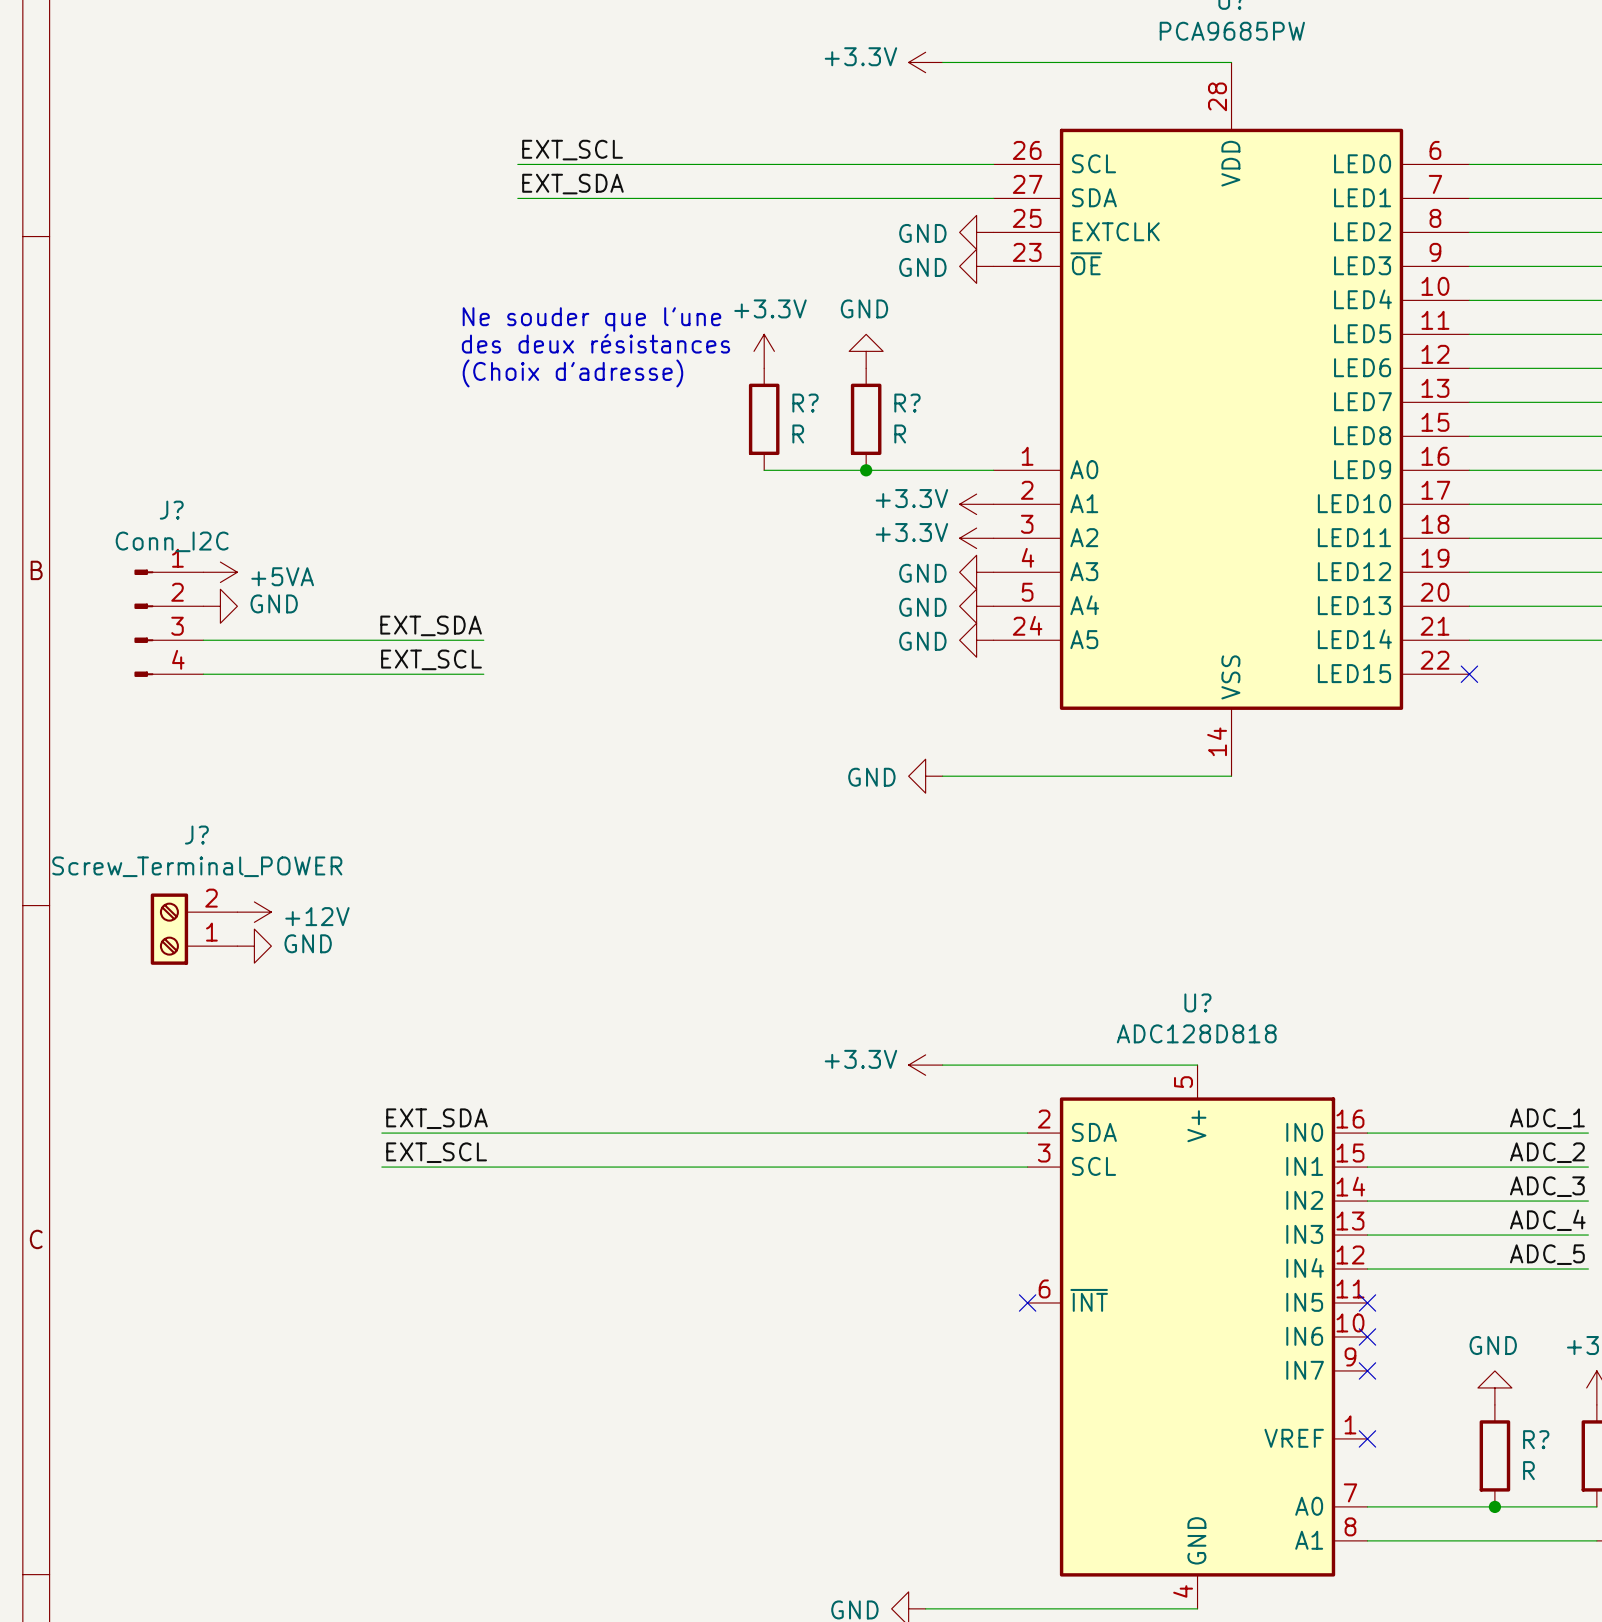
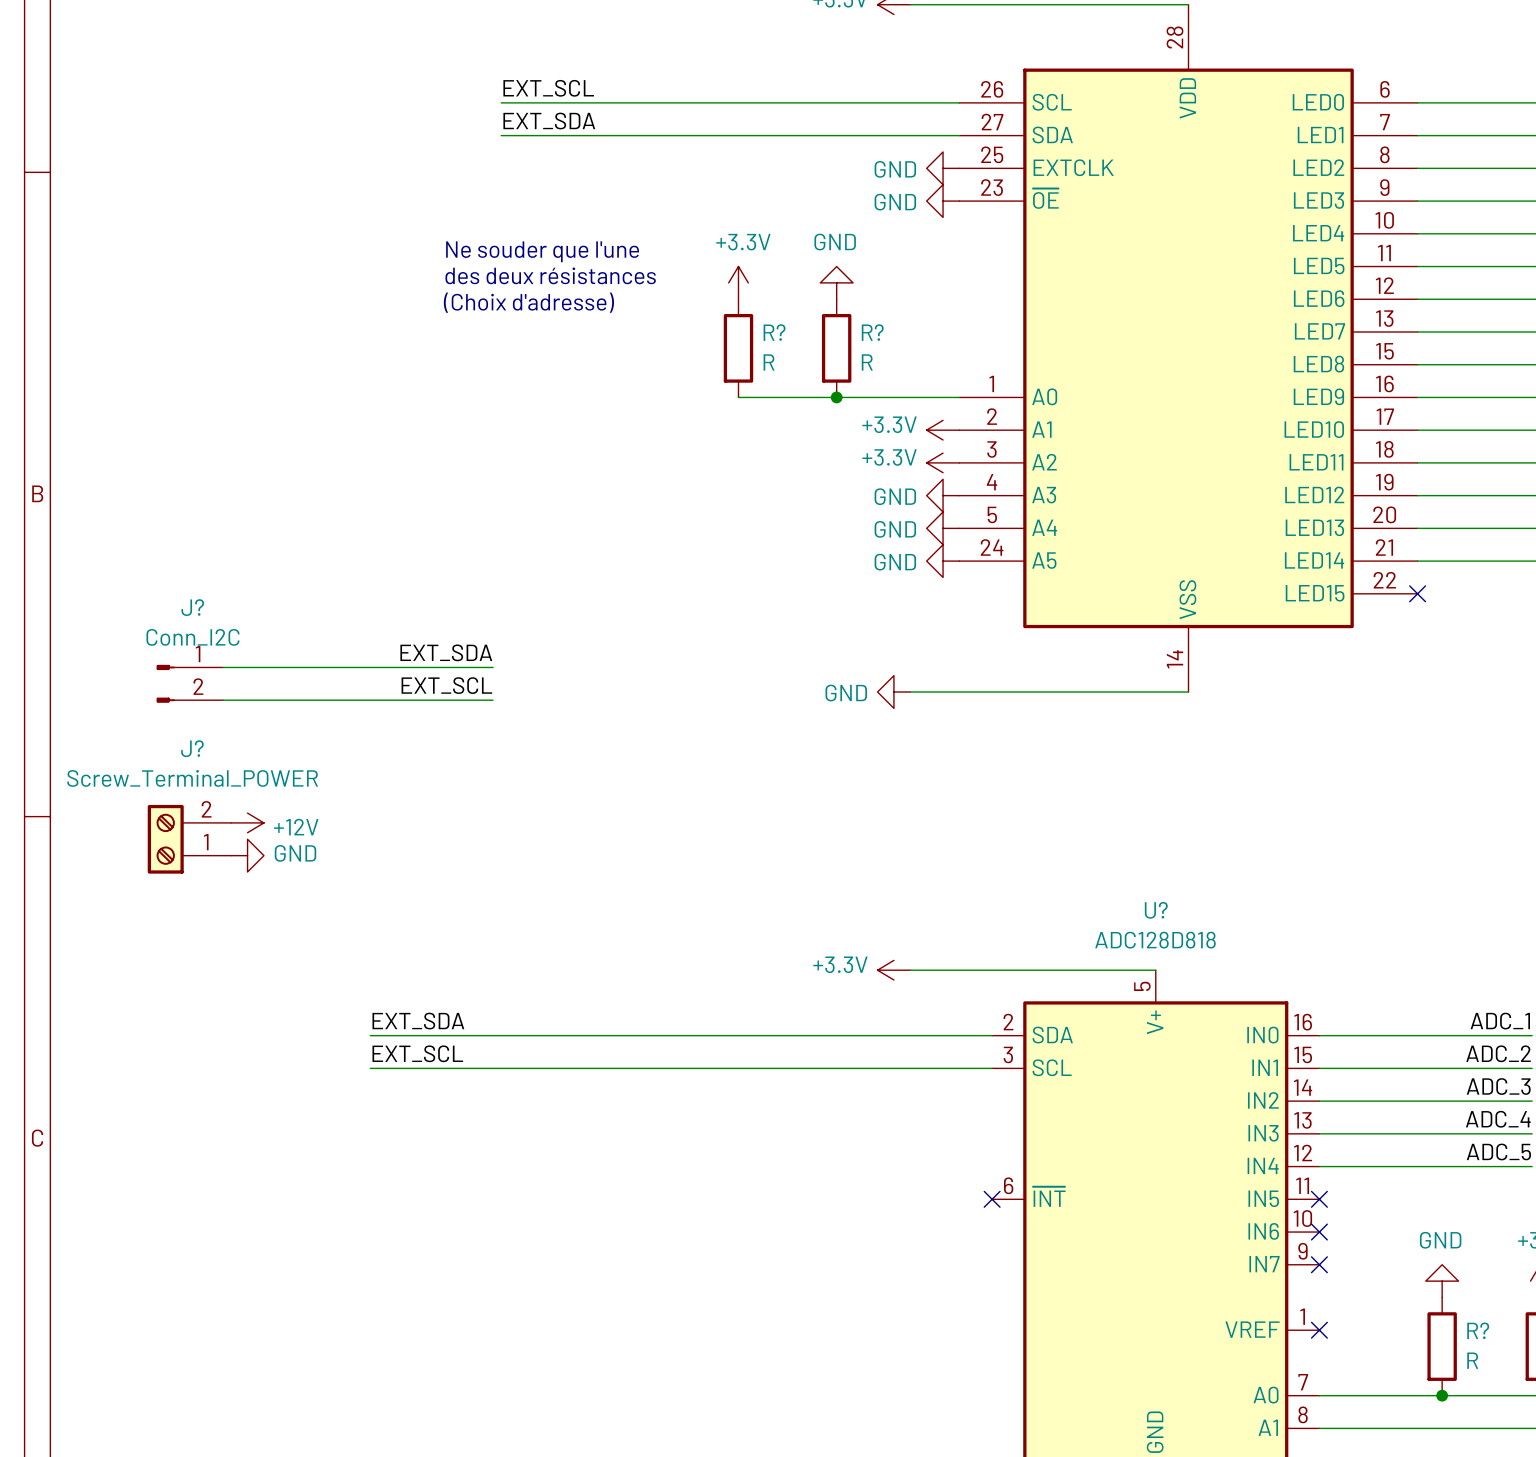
power symbol: +5VA (220, 572) -> none
power symbol: GND (220, 606) -> none
J?: Conn_I2C (168, 623) -> none
label position: EXT_SDA (431, 625) -> EXT_SDA (446, 652)
wire: (203, 640) (483, 640) -> (223, 700) (493, 700)
label position: EXT_SCL (431, 659) -> EXT_SCL (446, 685)
wire: (203, 674) (483, 674) -> (223, 667) (493, 667)
J?: none -> Conn_I2C (189, 683)

